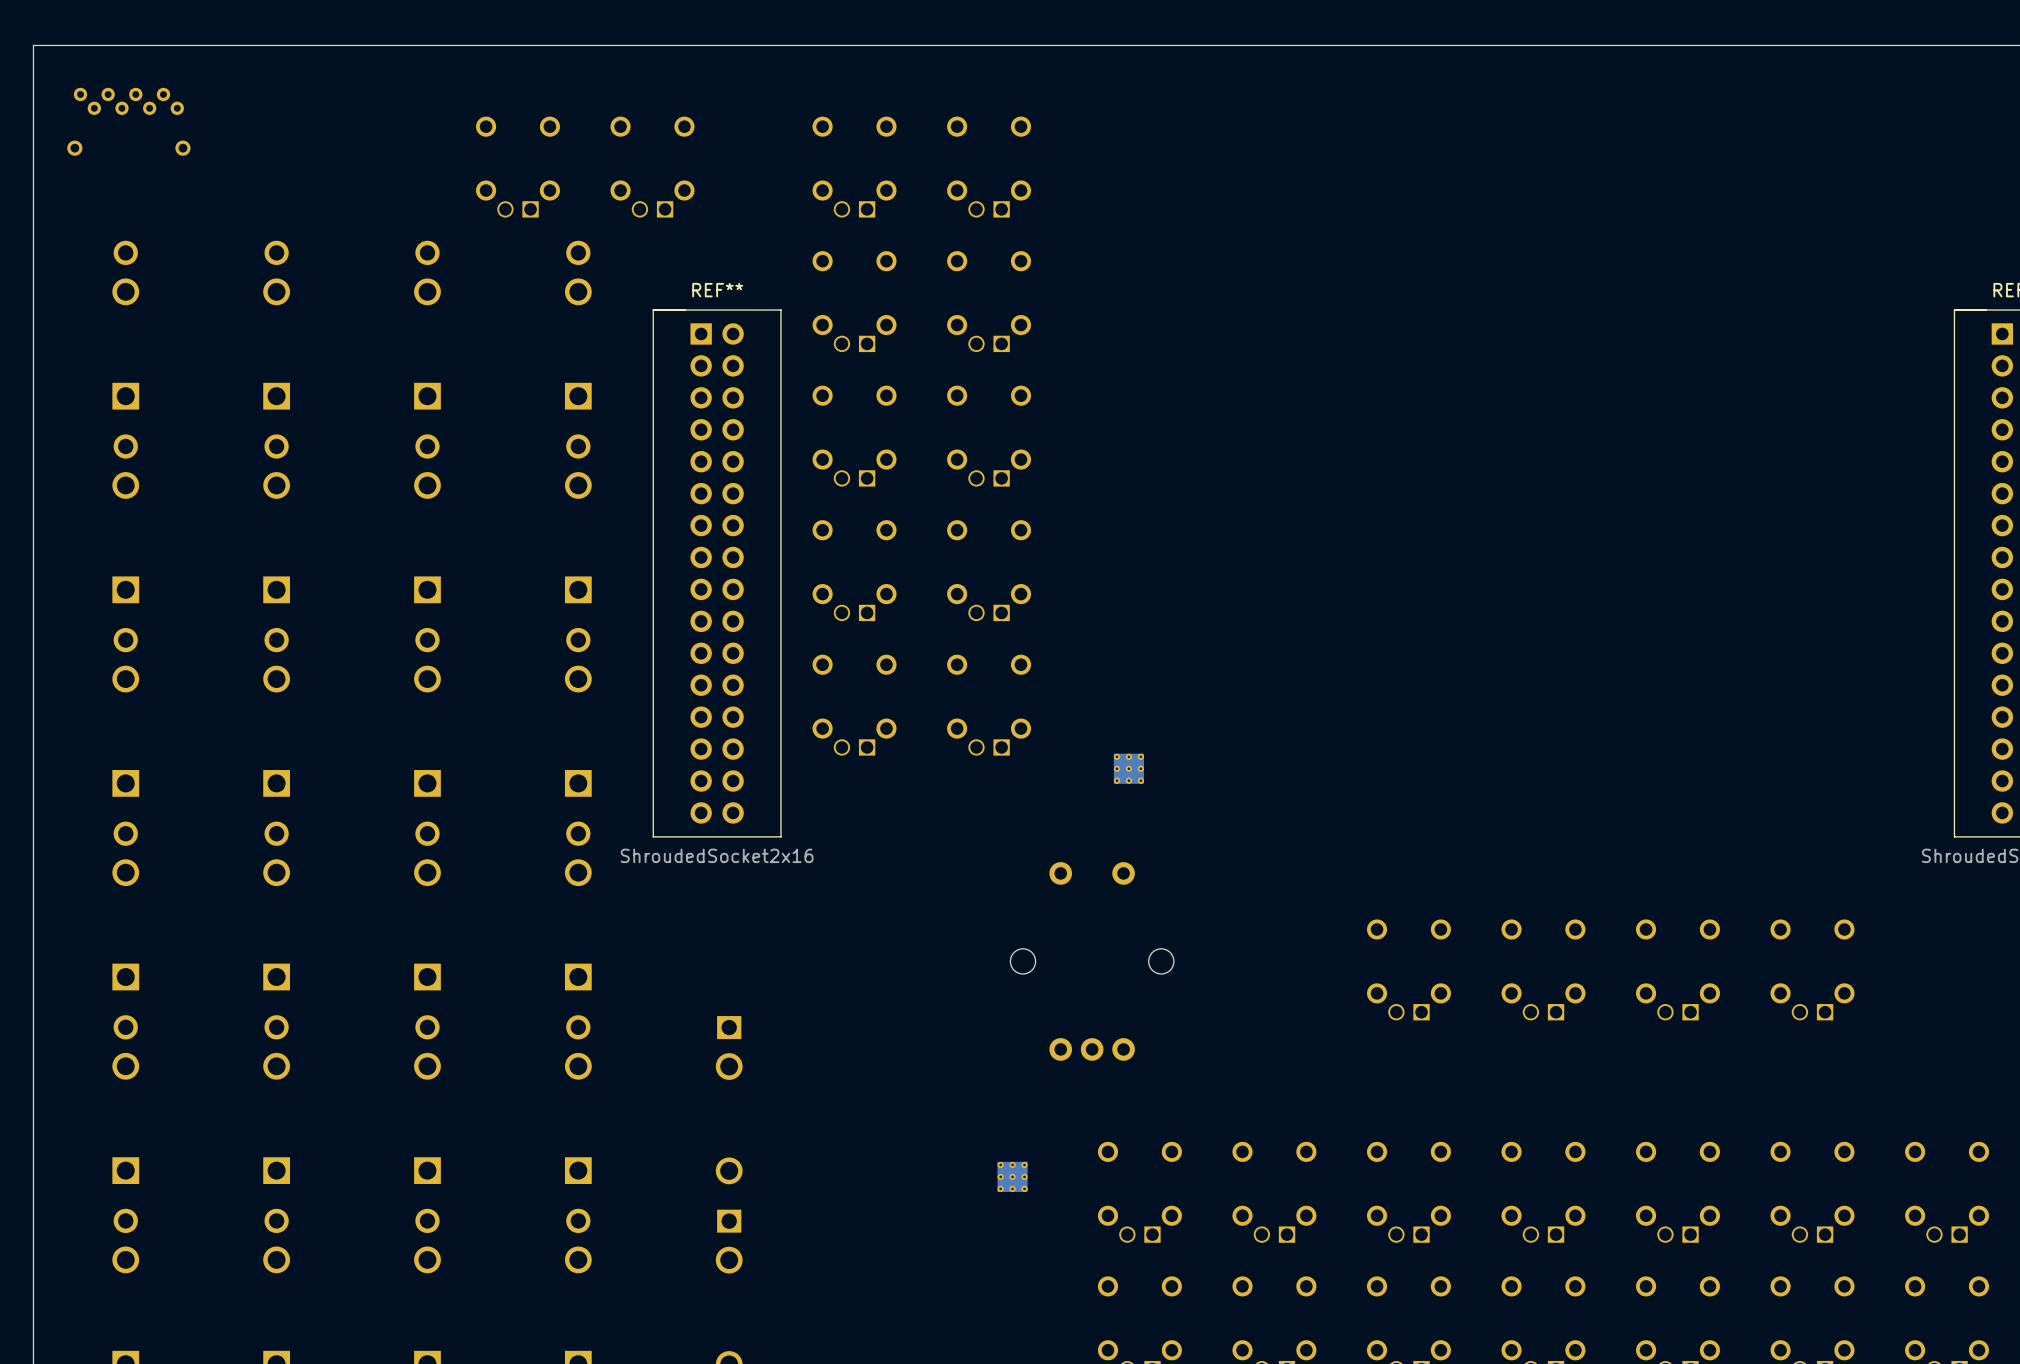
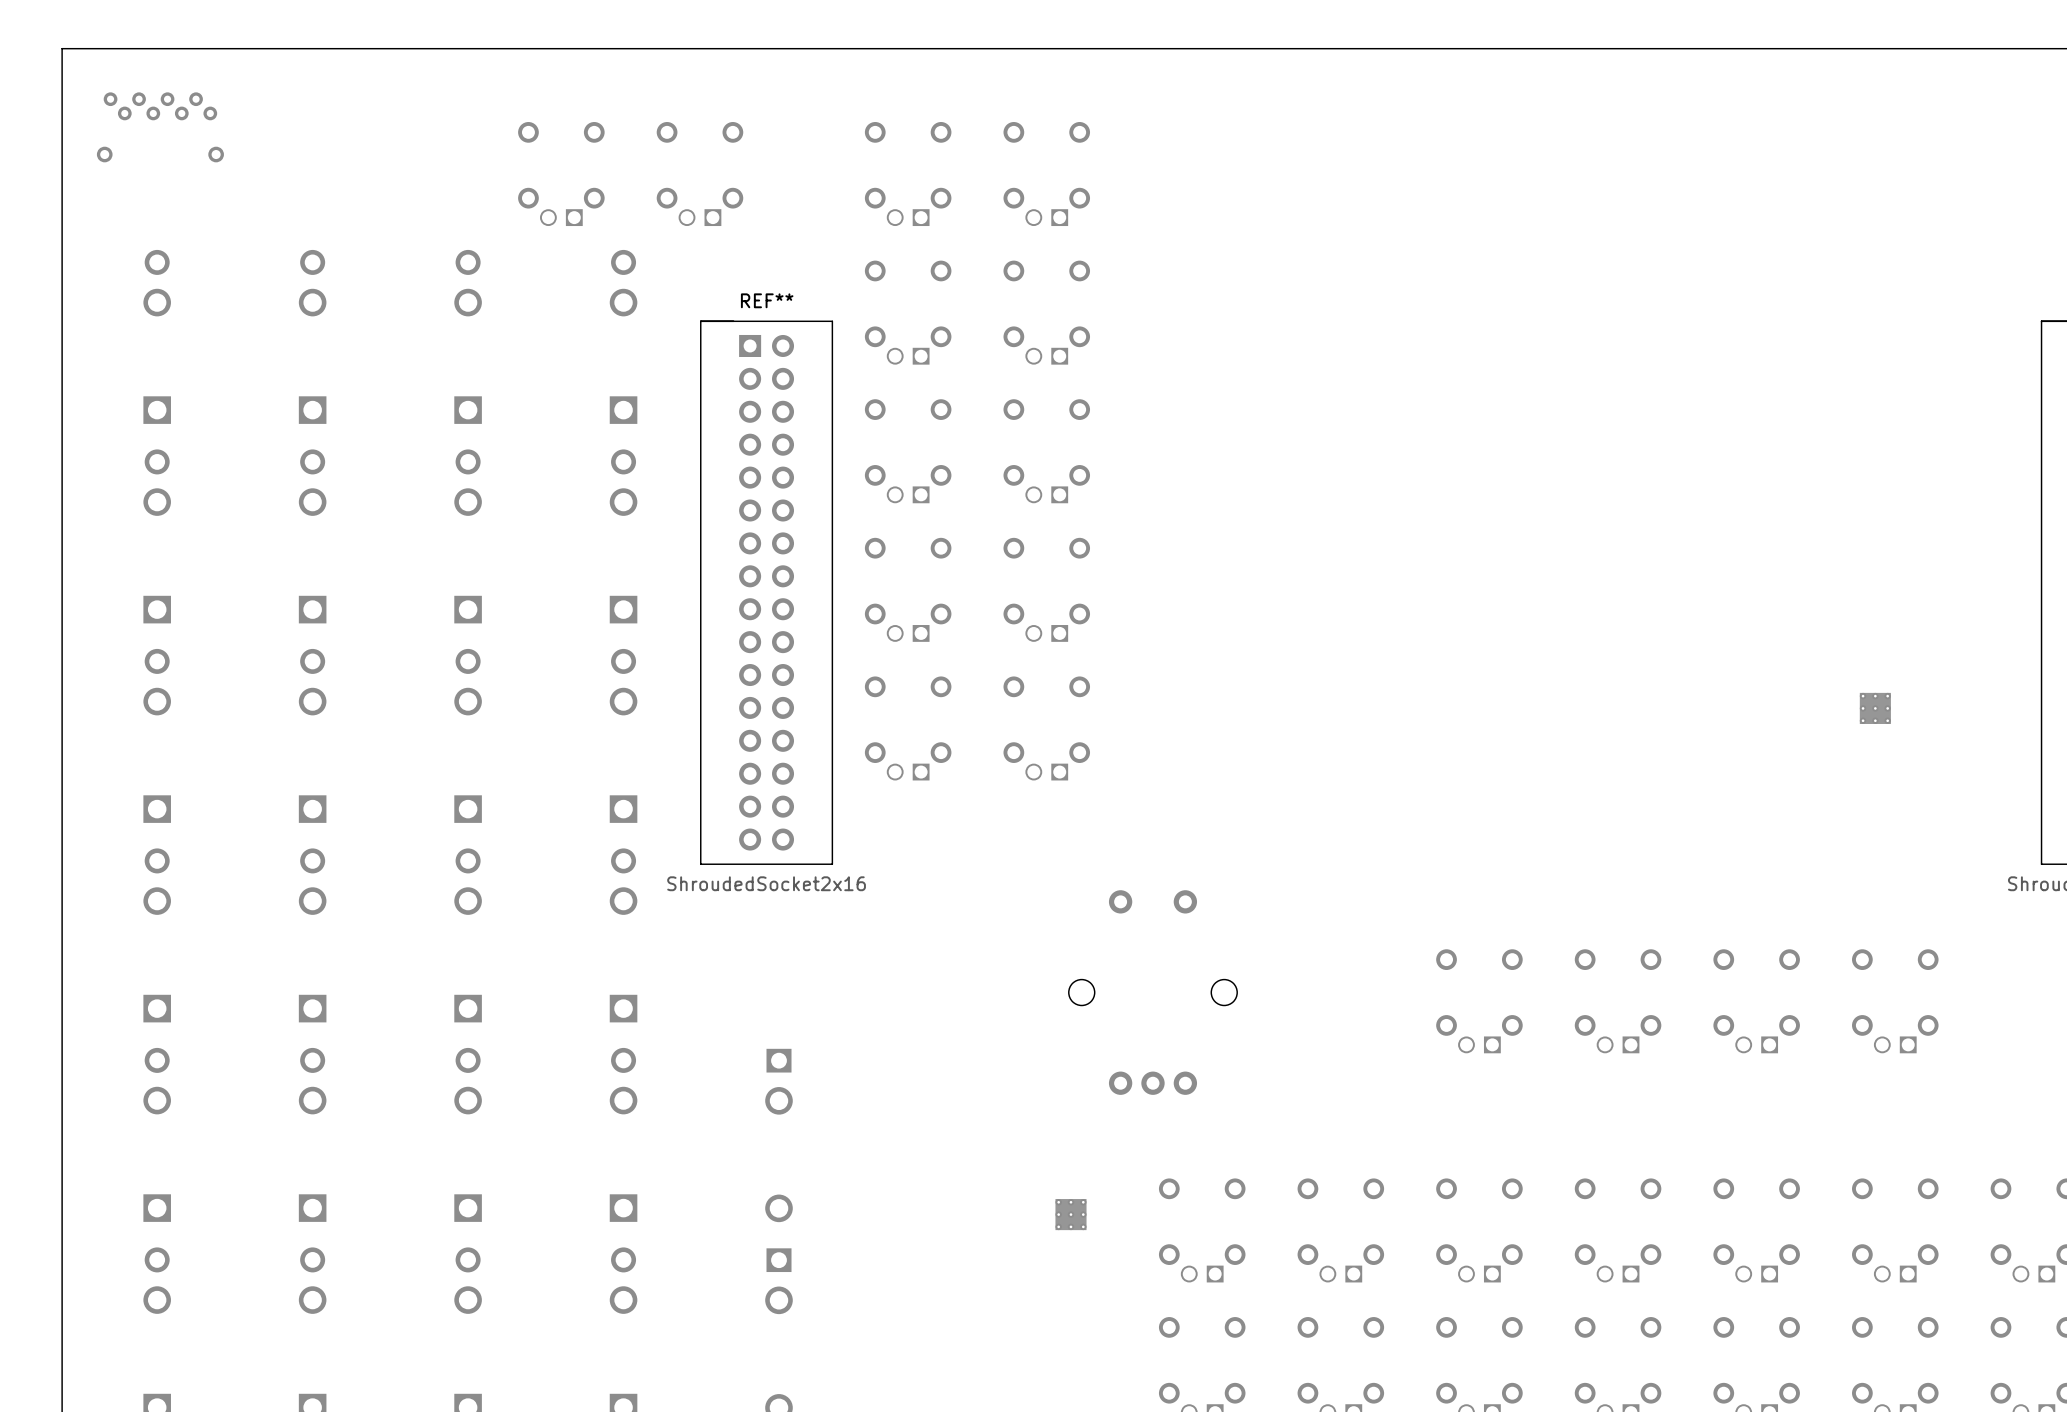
part: none -> (1875, 708)
part: (1128, 768) -> none

